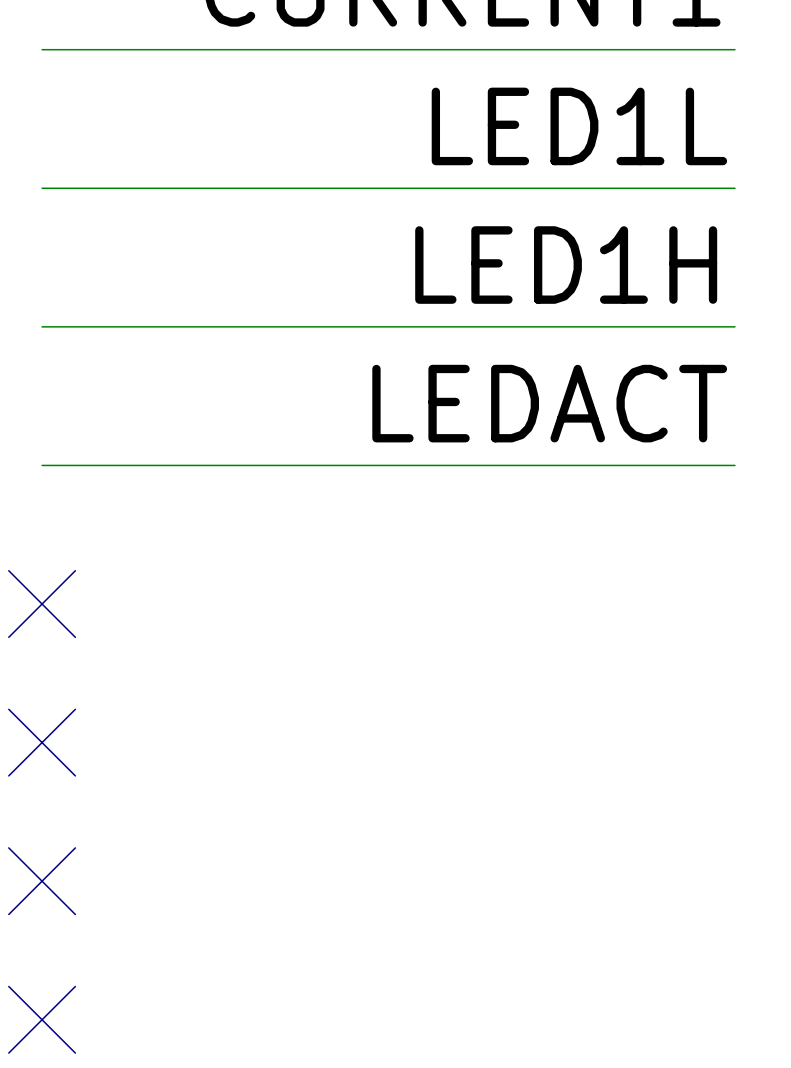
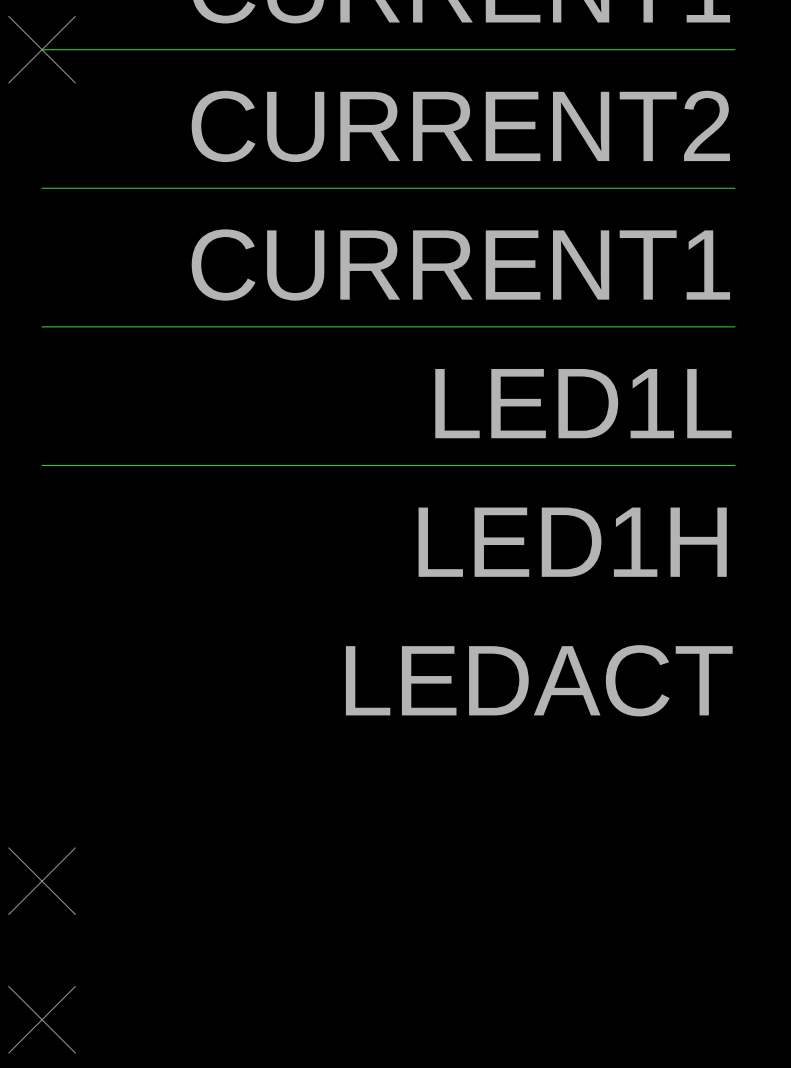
no-connect mark: none -> (42, 49)
label: LED1L (579, 126) -> CURRENT2 (460, 126)
label: LED1H (566, 265) -> CURRENT1 (460, 265)
label: LEDACT (549, 403) -> LED1L (583, 403)
label: none -> LED1H (572, 542)
no-connect mark: (42, 604) -> none
label: none -> LEDACT (539, 680)
no-connect mark: (42, 742) -> none

